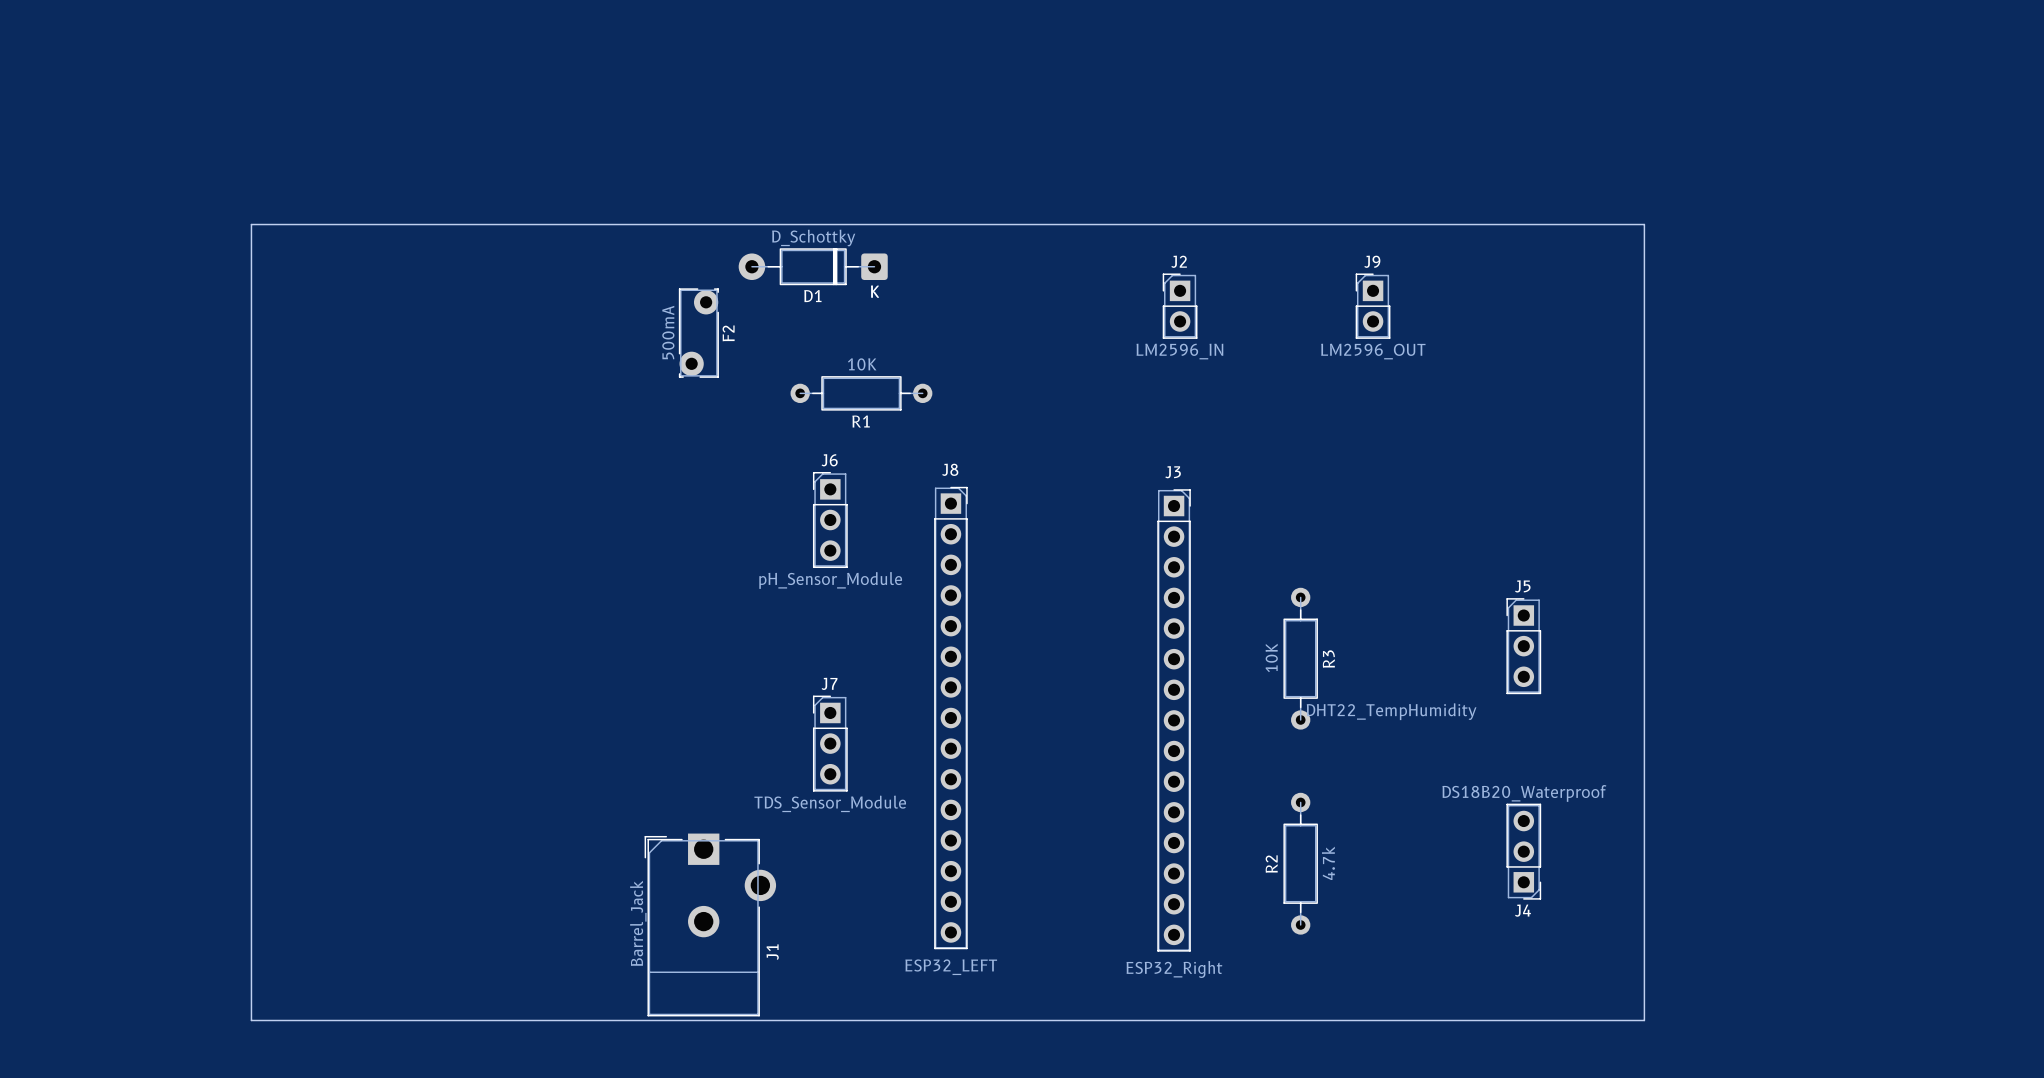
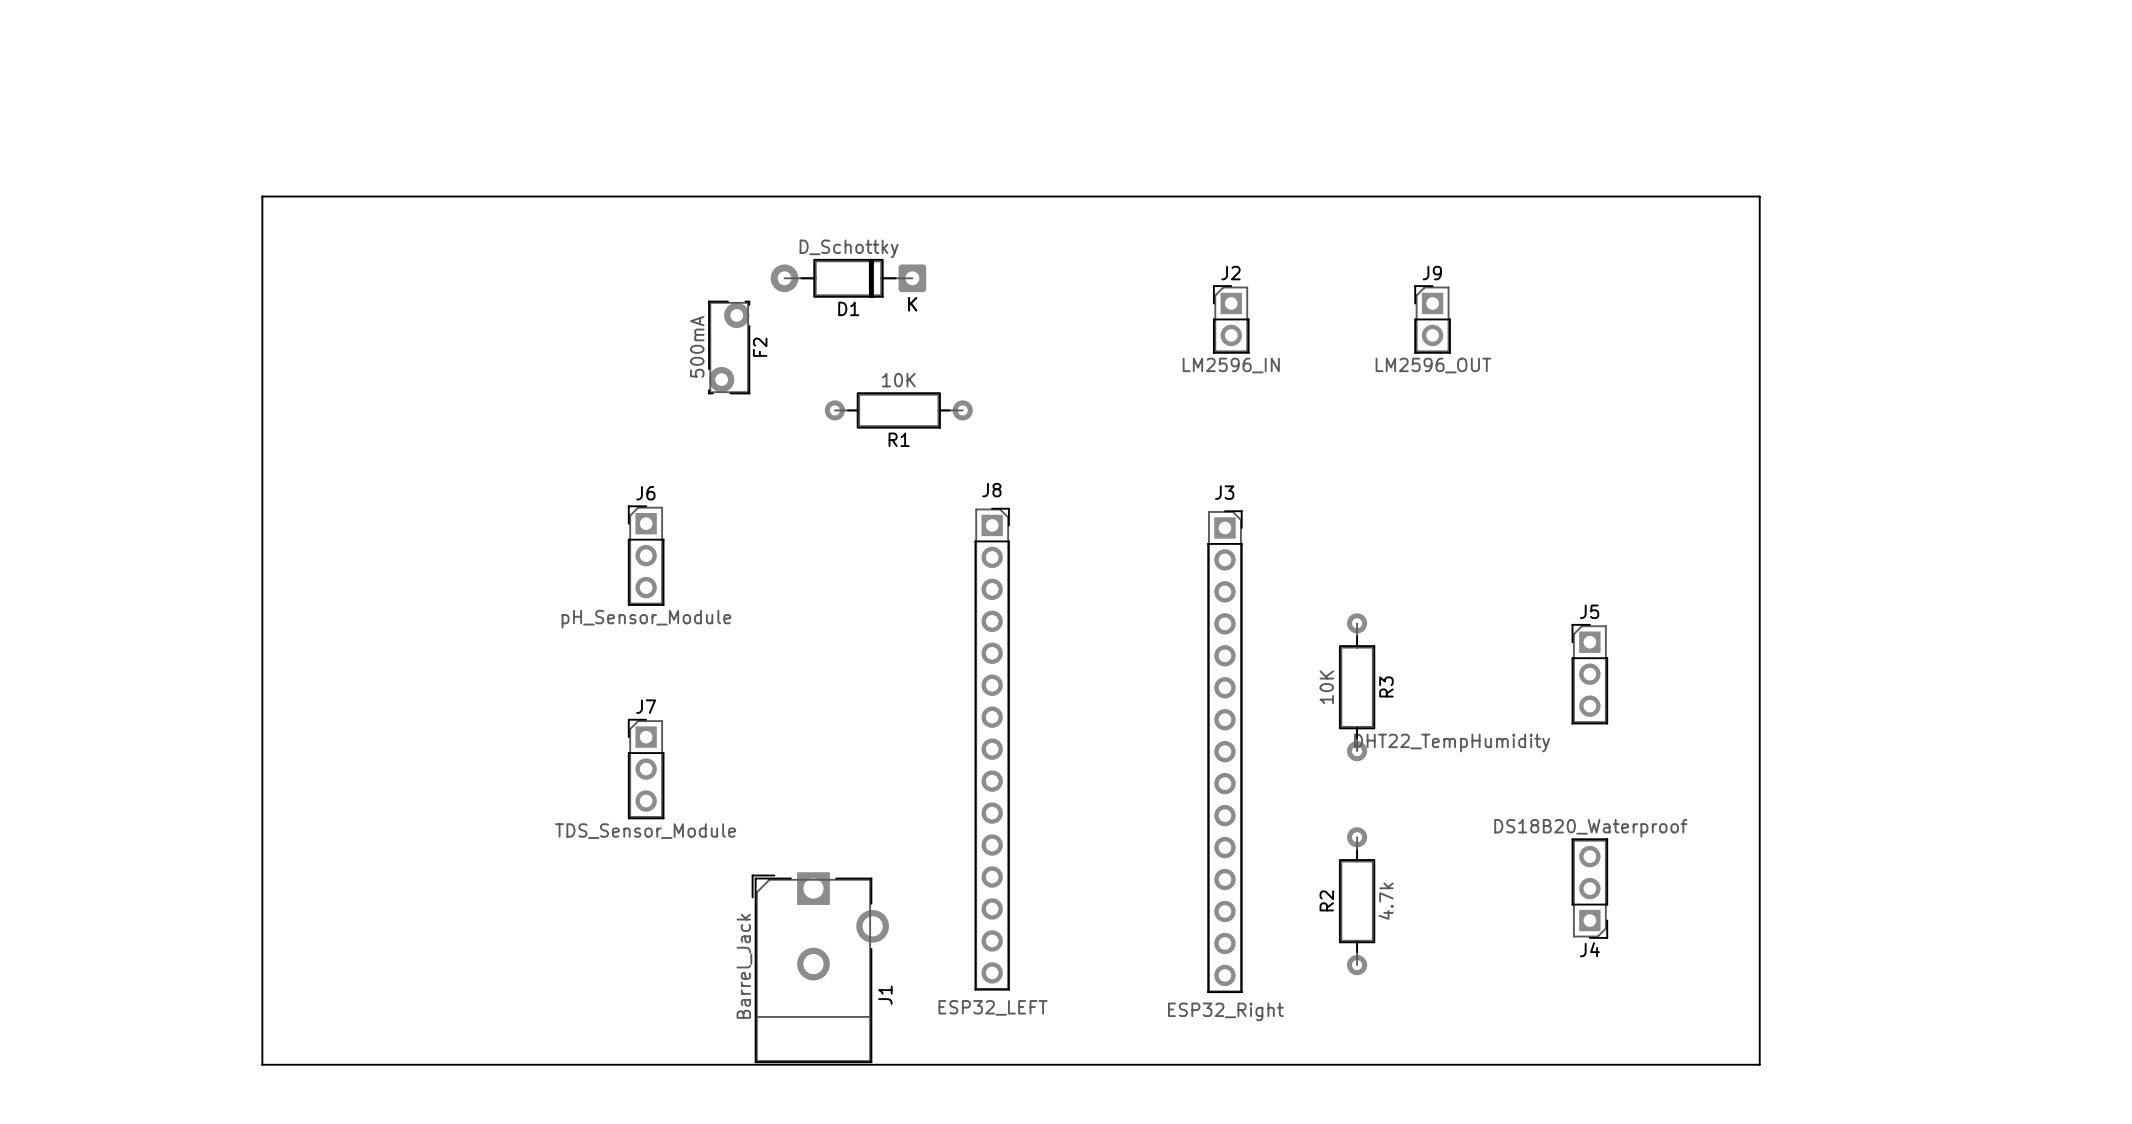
board edge: (251, 224) (1644, 224) (1644, 1020) -> (262, 234) (262, 196) (1759, 196) (1759, 1064) (1715, 1064)
J6 position: (830, 520) -> (646, 555)
J7 position: (830, 743) -> (646, 769)
J1 position: (710, 924) -> (820, 967)

